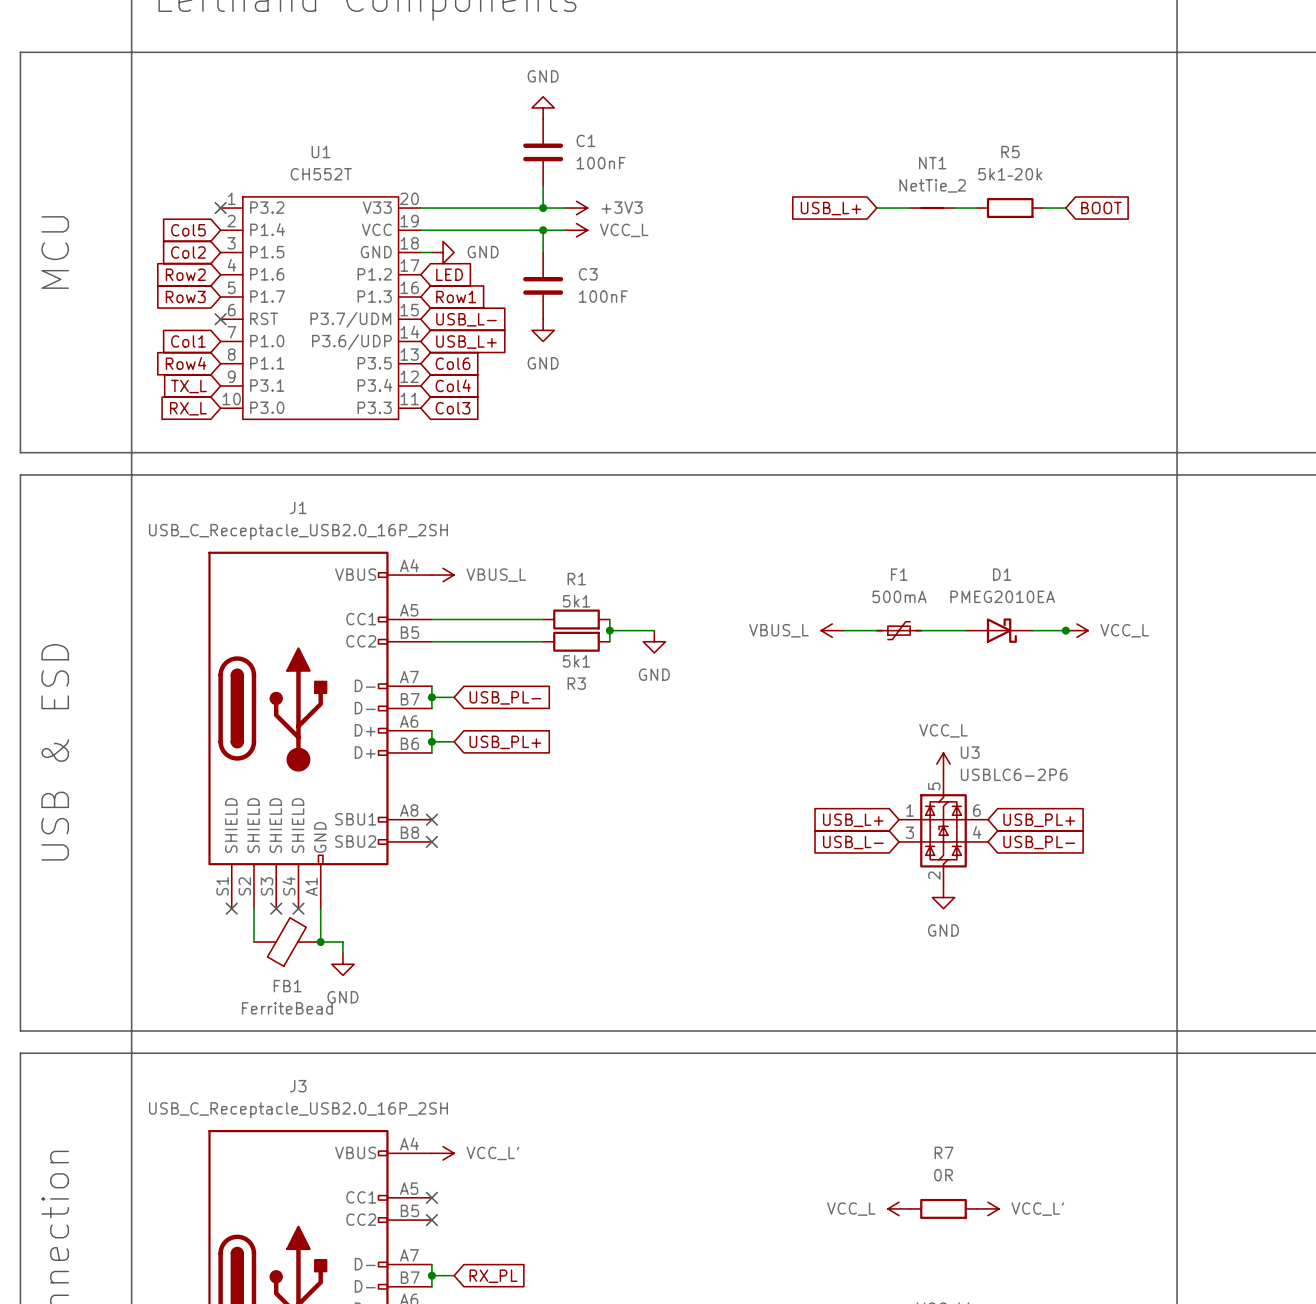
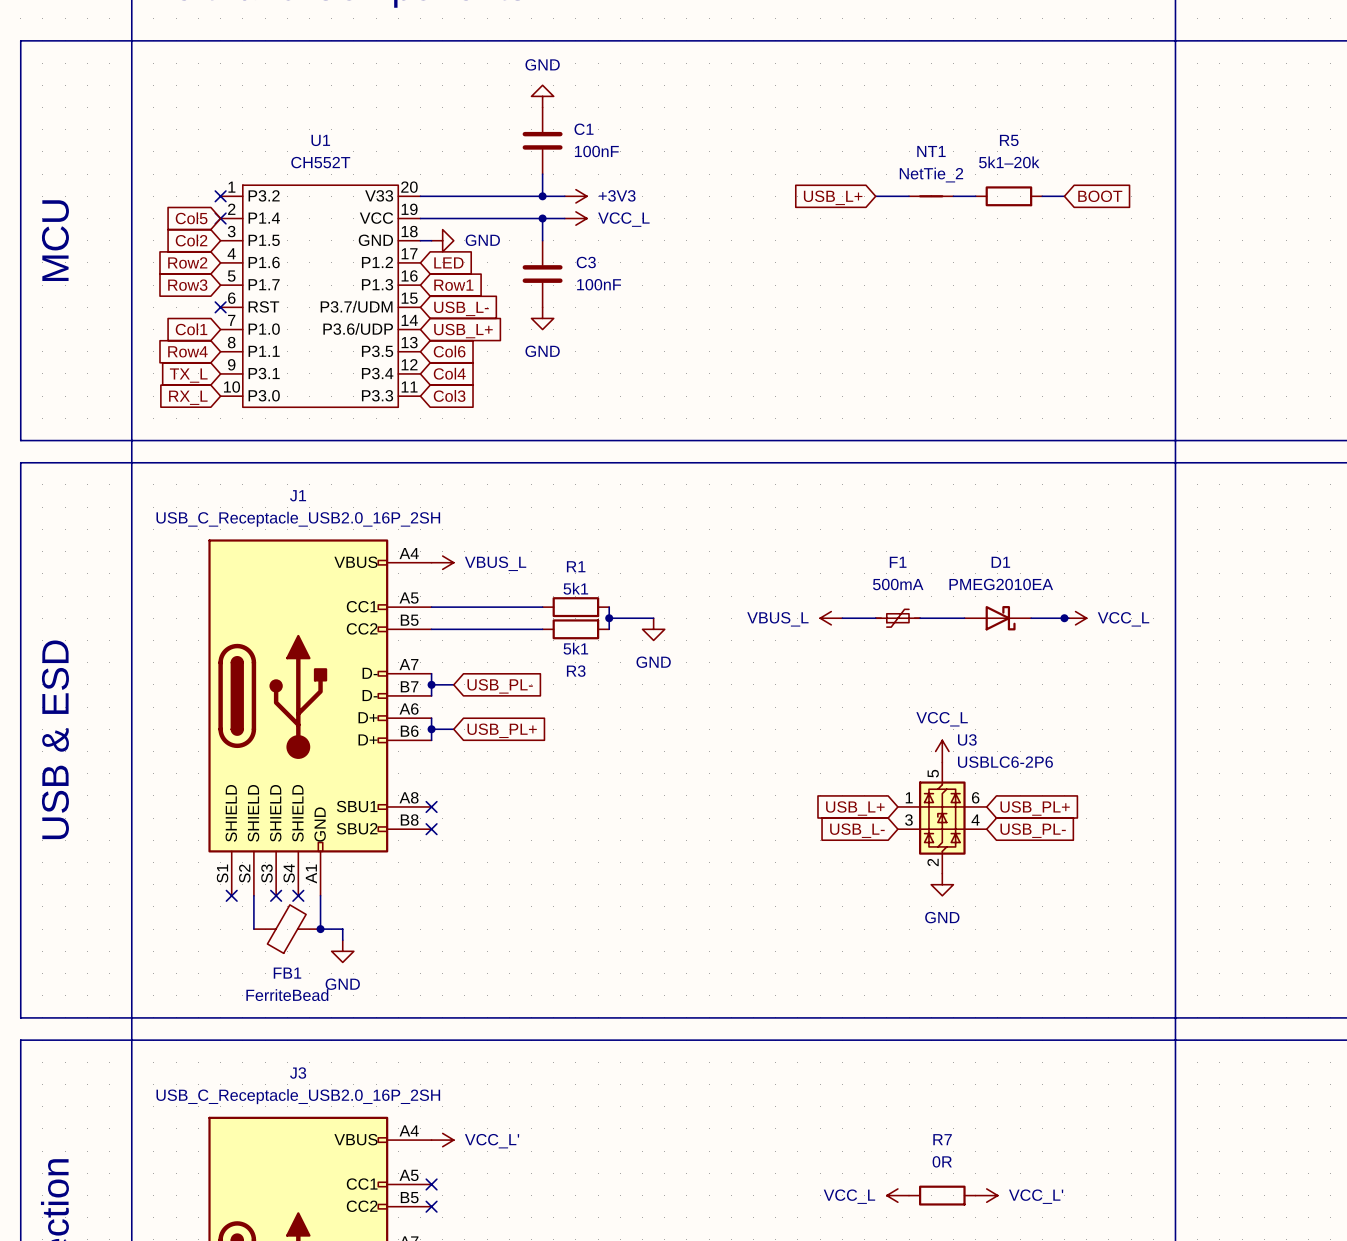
no-connect mark: none -> (220, 218)

